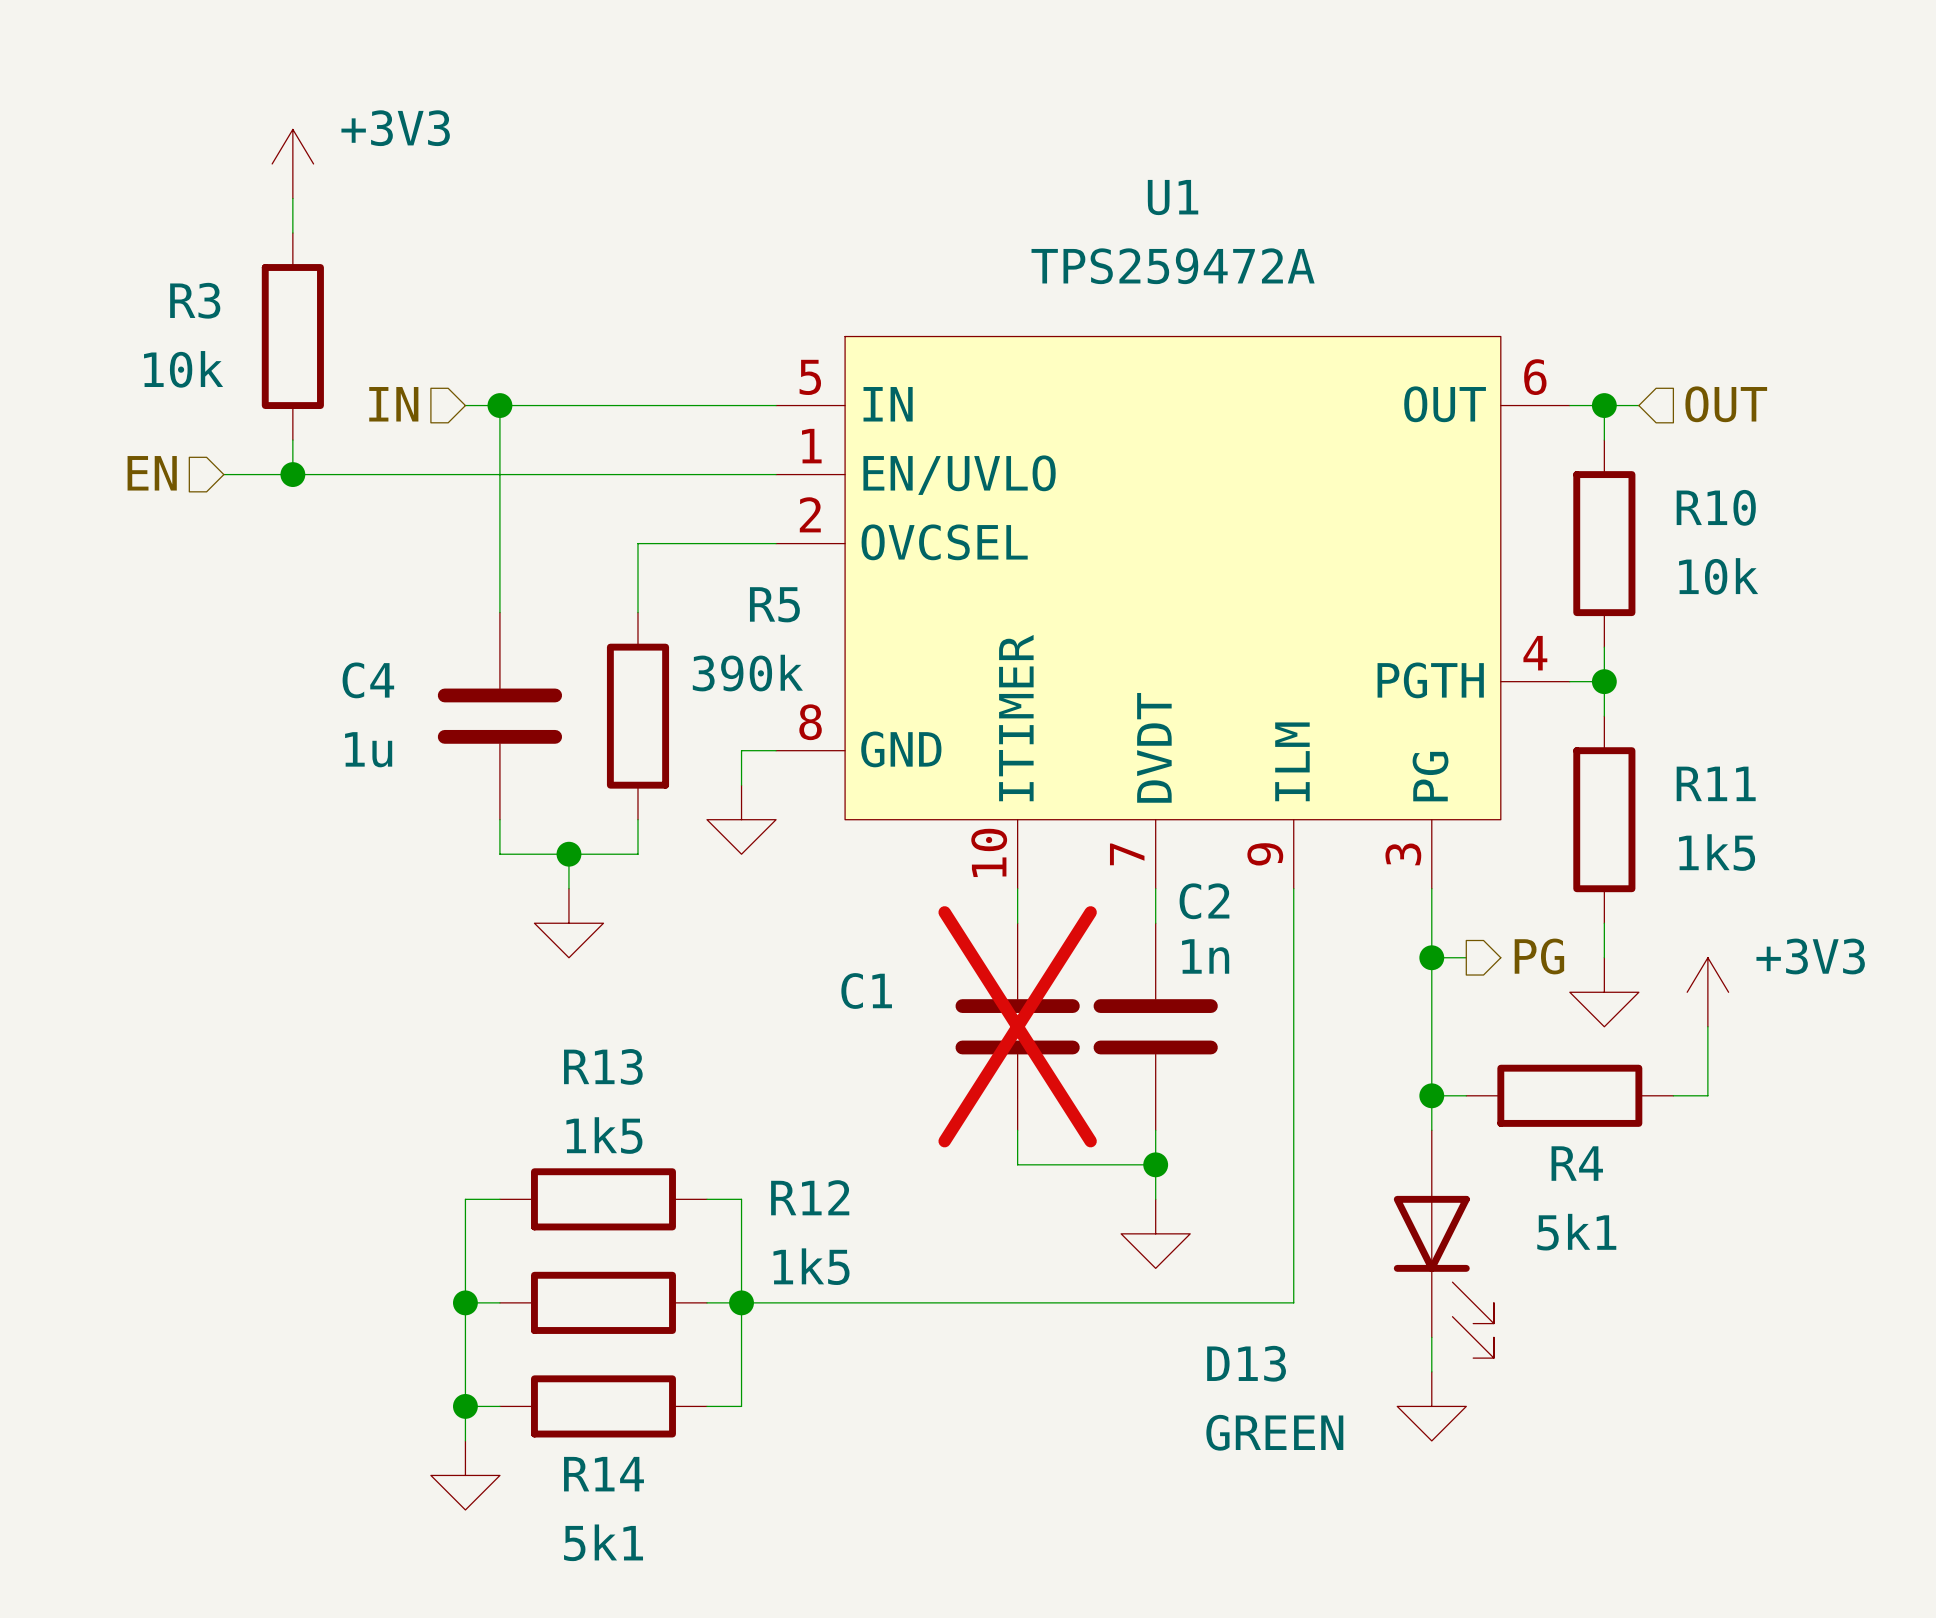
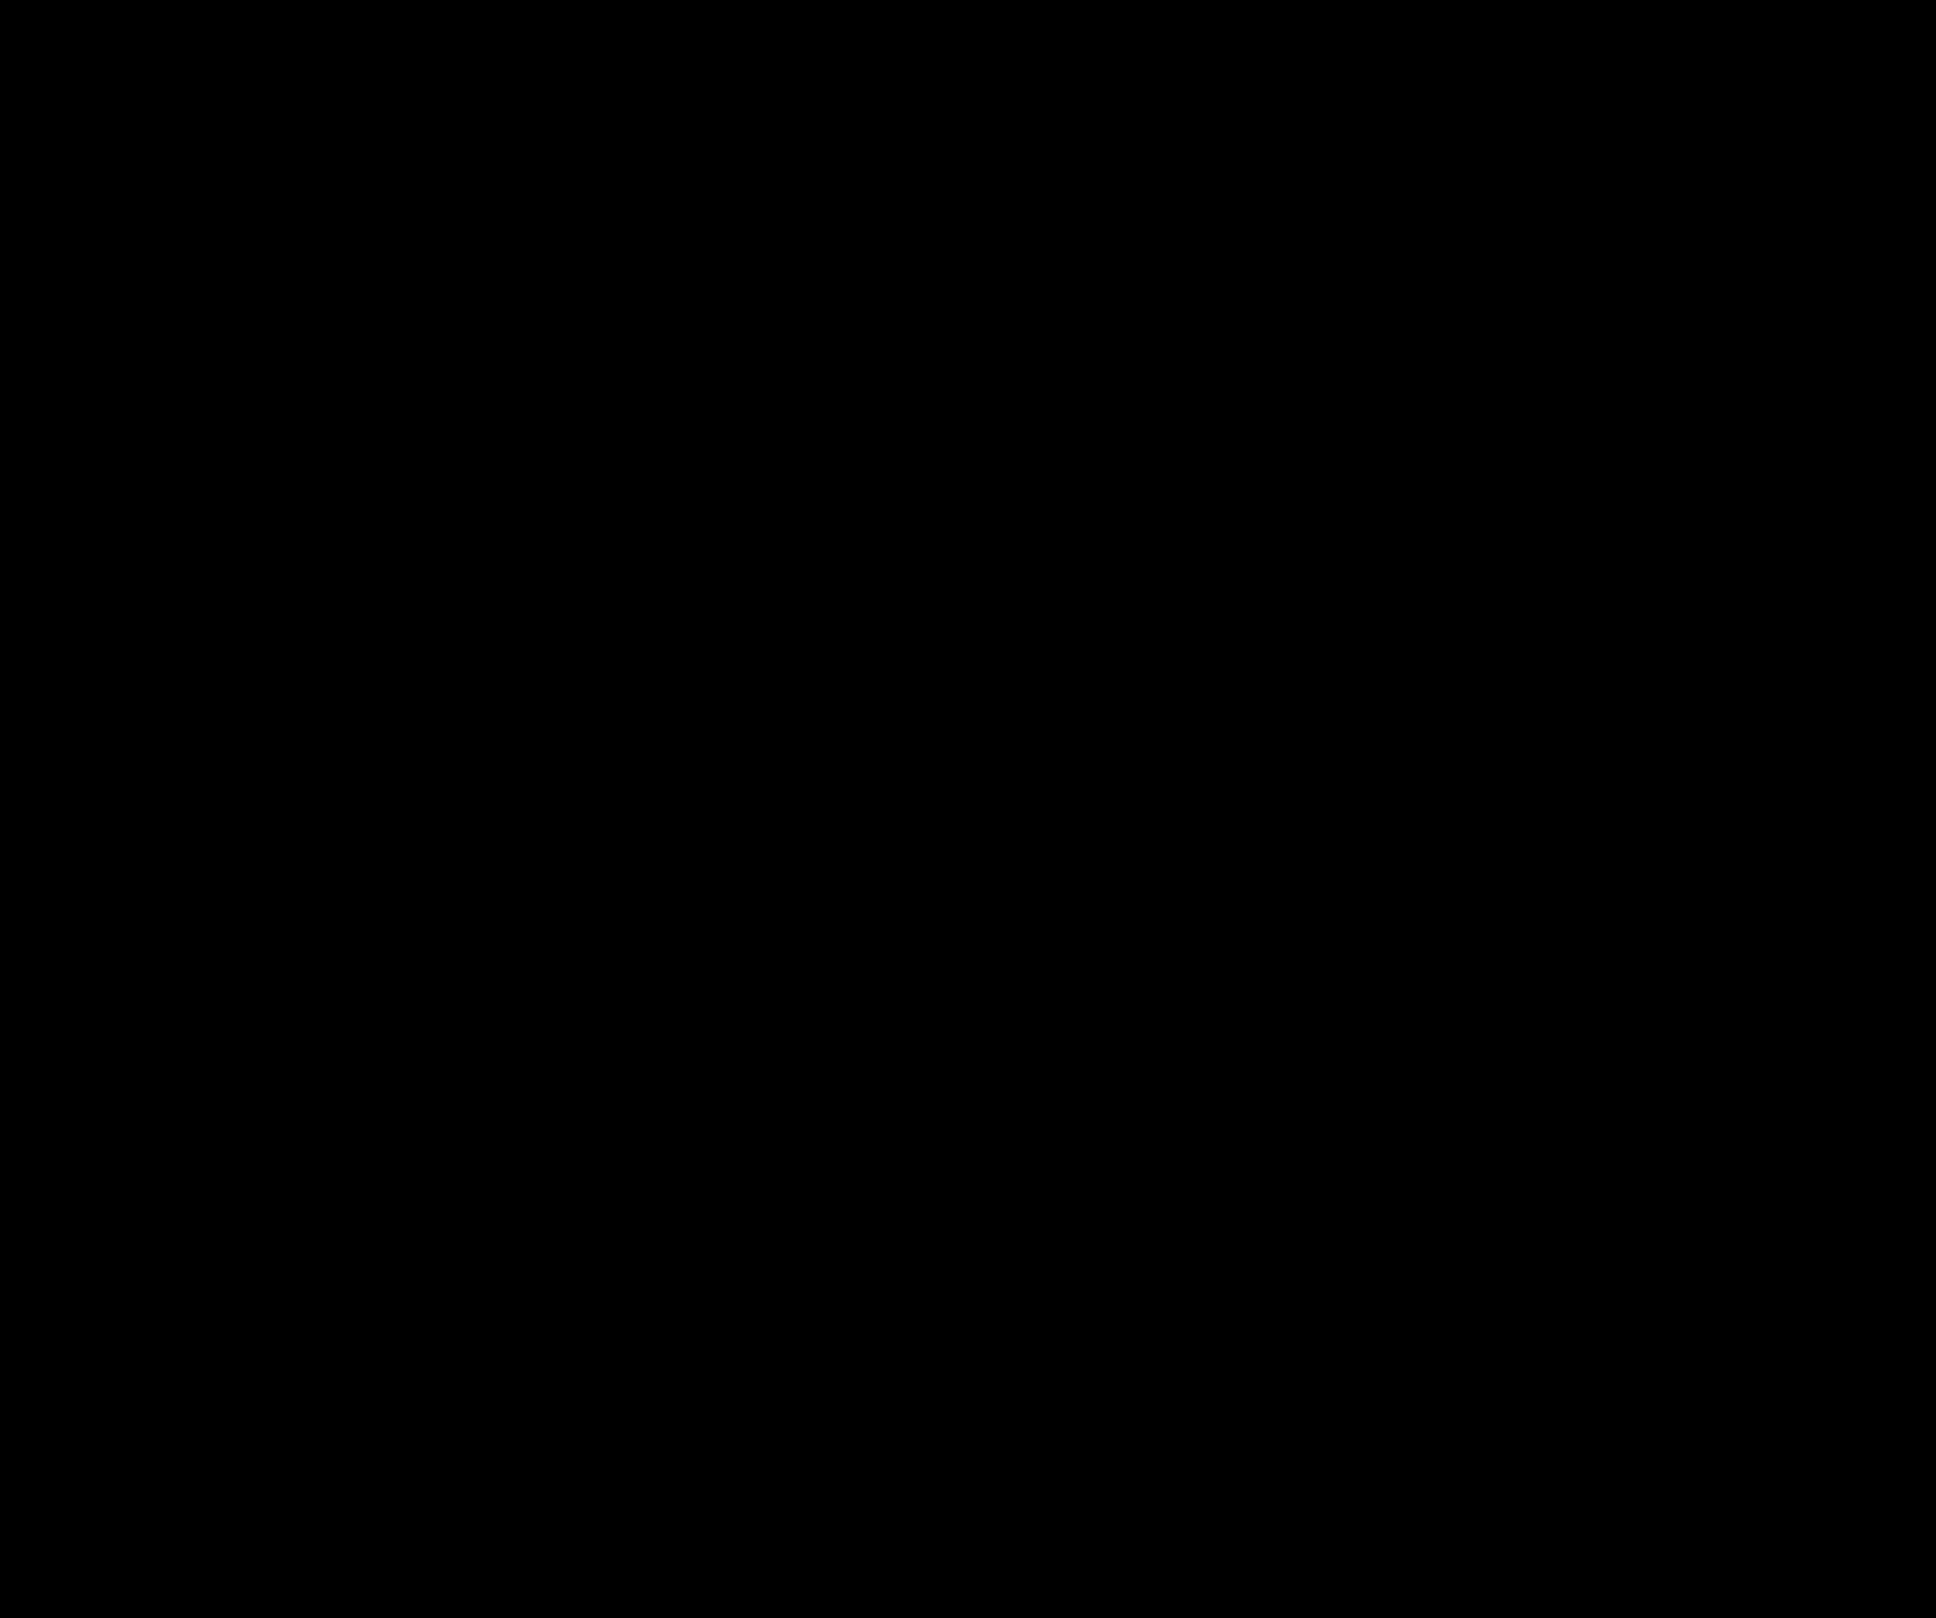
power symbol: +3V3 (292, 163) -> none
wire: (292, 198) (292, 232) -> none
R3: 10k (292, 336) -> none
hierarchical label: IN (393, 404) -> none
hierarchical label: OUT (1726, 404) -> none
wire: (465, 405) (776, 405) -> none
wire: (499, 405) (499, 612) -> none
junction: (499, 405) -> none
wire: (1569, 405) (1638, 405) -> none
wire: (1604, 405) (1604, 440) -> none
junction: (1604, 405) -> none
wire: (292, 440) (292, 474) -> none
hierarchical label: EN (152, 473) -> none
wire: (223, 474) (776, 474) -> none
junction: (292, 474) -> none
wire: (776, 543) (637, 543) (637, 612) -> none
R10: 10k (1604, 543) -> none
U1: TPS259472A (1172, 612) -> none
wire: (1604, 647) (1604, 716) -> none
wire: (1569, 681) (1604, 681) -> none
junction: (1604, 681) -> none
C4: 1u (499, 716) -> none
R5: 390k (637, 716) -> none
wire: (776, 750) (741, 750) (741, 785) -> none
wire: (499, 819) (499, 854) (637, 854) (637, 819) -> none
power symbol: (741, 819) -> none
R11: 1k5 (1604, 819) -> none
wire: (568, 854) (568, 888) -> none
junction: (568, 854) -> none
wire: (1017, 888) (1017, 923) -> none
wire: (1155, 888) (1155, 923) -> none
wire: (1293, 888) (1293, 1302) (707, 1302) -> none
wire: (1431, 888) (1431, 1130) -> none
power symbol: (568, 923) -> none
wire: (1604, 923) (1604, 957) -> none
hierarchical label: PG (1539, 956) -> none
wire: (1431, 957) (1466, 957) -> none
junction: (1431, 957) -> none
power symbol: (1604, 992) -> none
power symbol: +3V3 (1707, 992) -> none
C1: (1017, 1026) -> none
C2: 1n (1155, 1026) -> none
wire: (1707, 1026) (1707, 1095) (1673, 1095) -> none
wire: (1431, 1095) (1466, 1095) -> none
junction: (1431, 1095) -> none
R4: 5k1 (1569, 1095) -> none
wire: (1017, 1130) (1017, 1164) (1155, 1164) -> none
wire: (1155, 1130) (1155, 1199) -> none
junction: (1155, 1164) -> none
wire: (499, 1199) (465, 1199) (465, 1440) -> none
R13: 1k5 (603, 1199) -> none
wire: (707, 1199) (741, 1199) (741, 1406) (707, 1406) -> none
power symbol: (1155, 1233) -> none
D13: GREEN (1443, 1244) -> none
wire: (465, 1302) (499, 1302) -> none
junction: (465, 1302) -> none
R12: 1k5 (603, 1302) -> none
junction: (741, 1302) -> none
wire: (1431, 1337) (1431, 1371) -> none
wire: (465, 1406) (499, 1406) -> none
junction: (465, 1406) -> none
R14: 5k1 (603, 1406) -> none
power symbol: (1431, 1406) -> none
power symbol: (465, 1475) -> none

